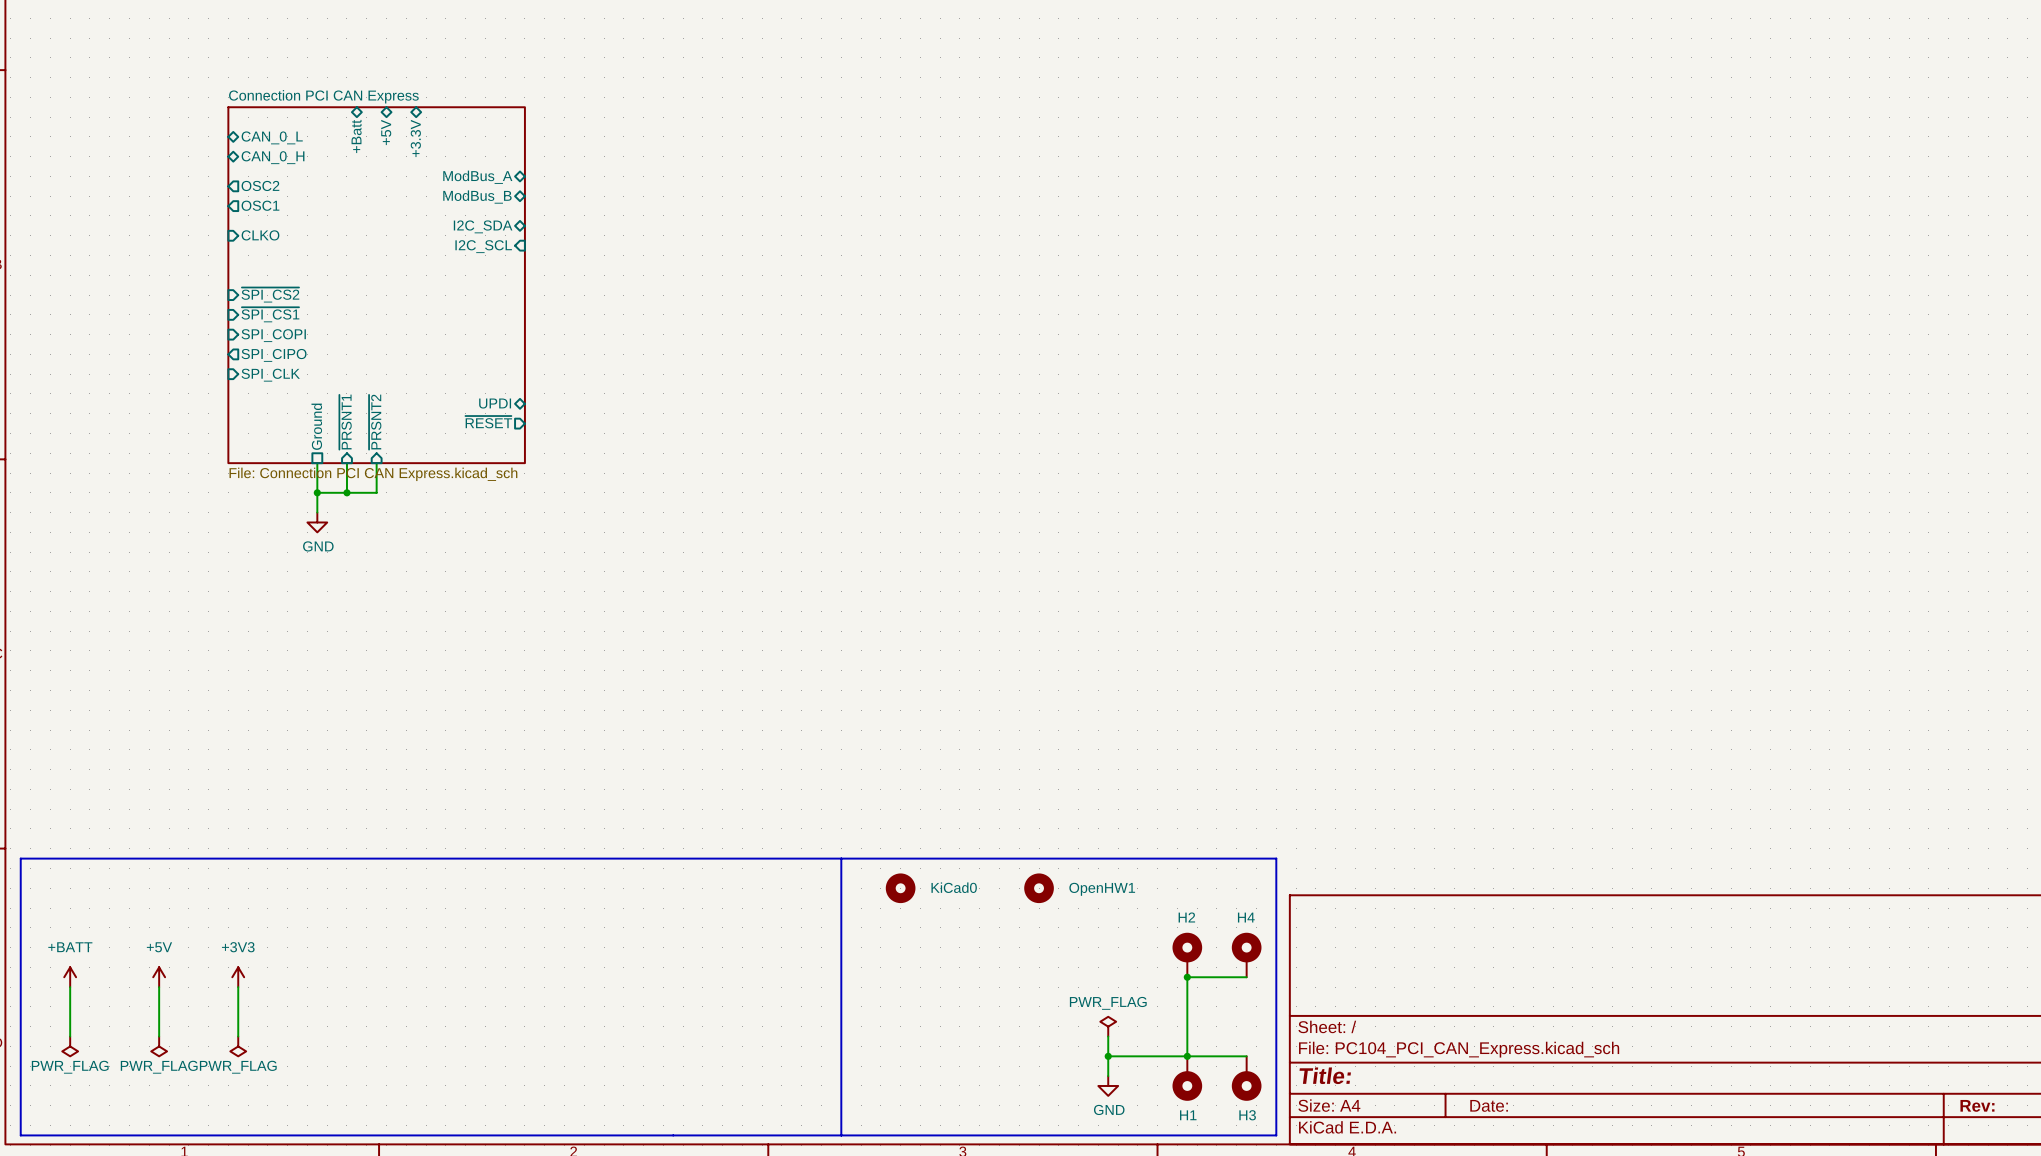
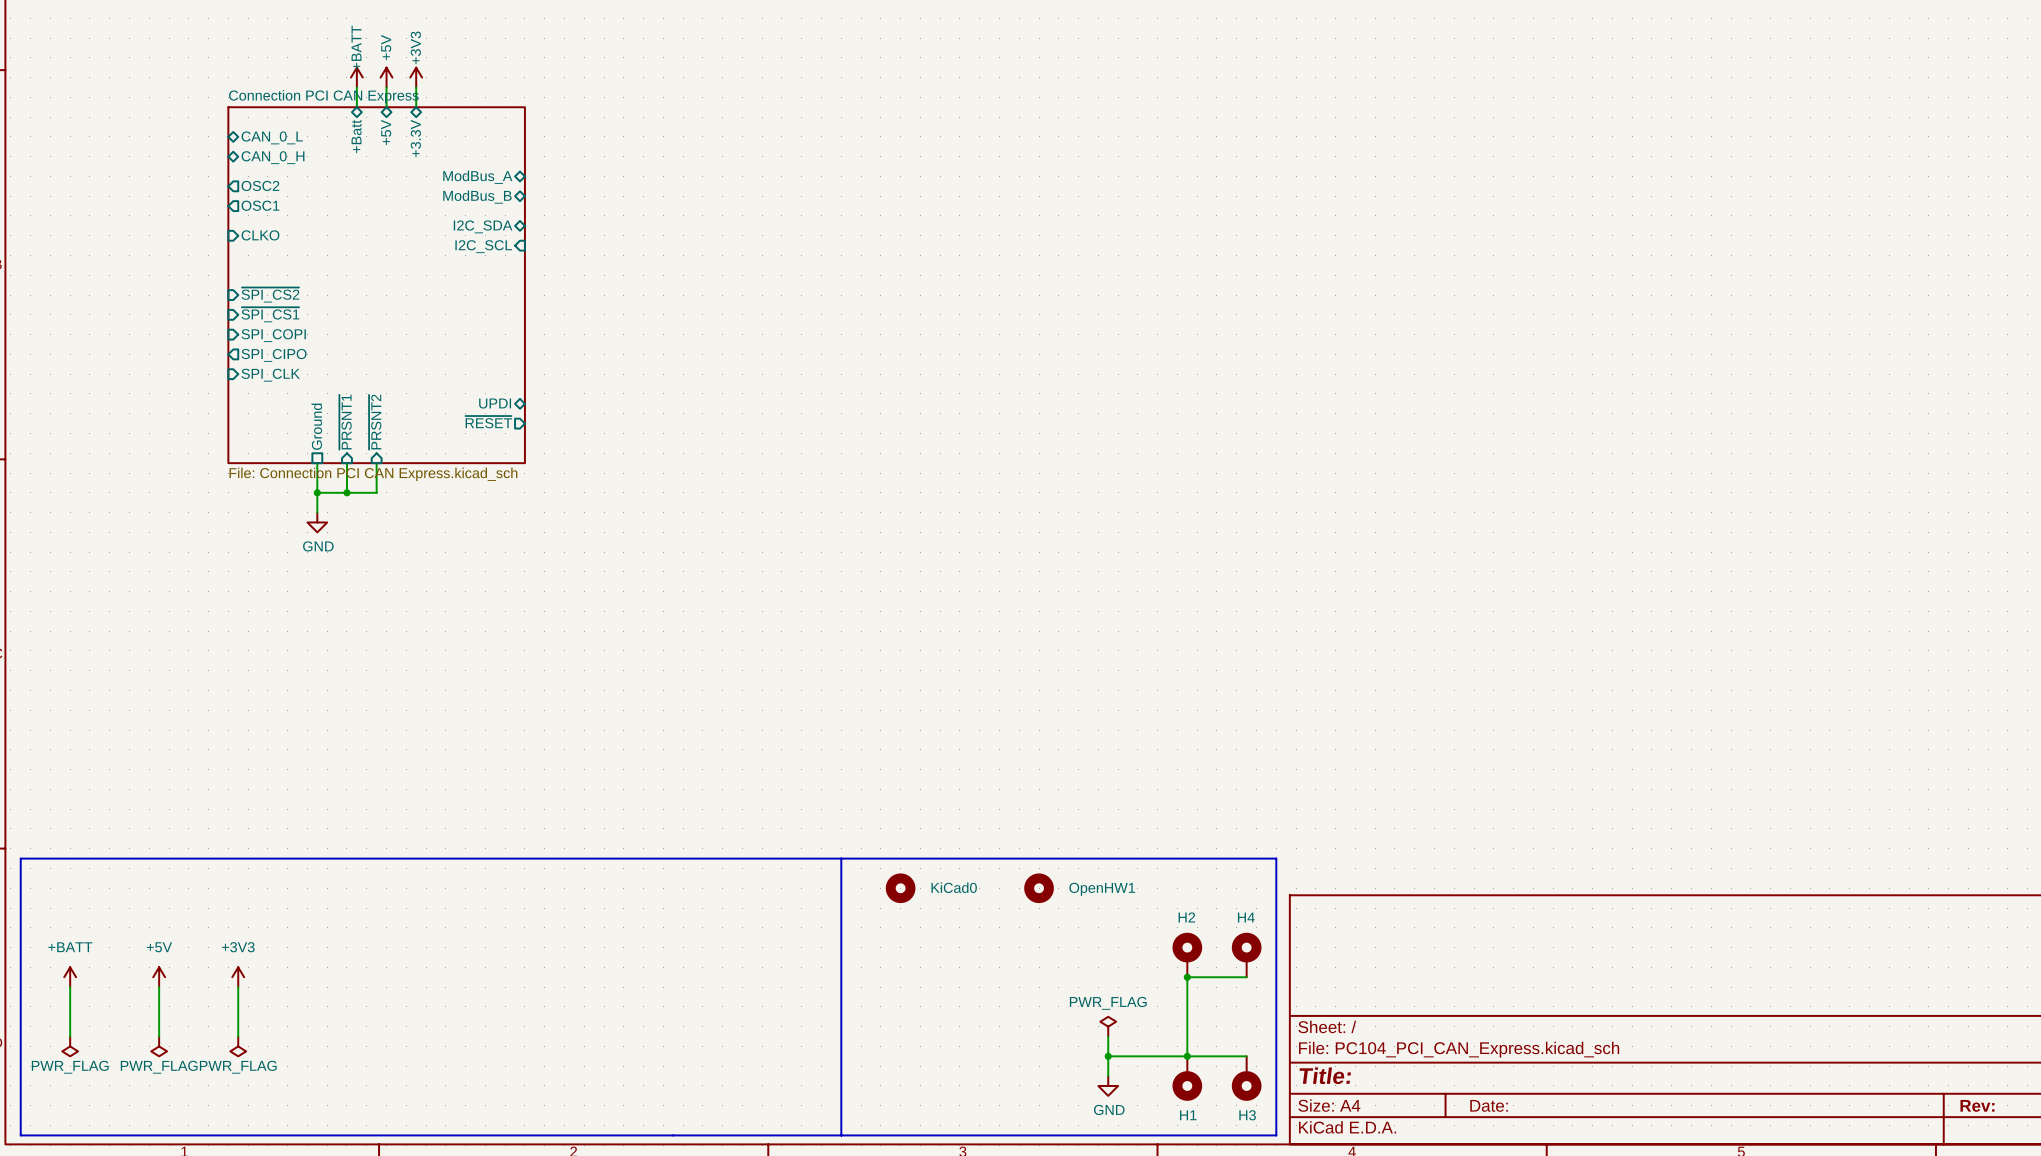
power symbol: none -> +BATT (356, 77)
power symbol: none -> +5V (386, 77)
power symbol: none -> +3V3 (416, 77)
wire: none -> (356, 87) (356, 107)
wire: none -> (386, 87) (386, 107)
wire: none -> (416, 87) (416, 107)

